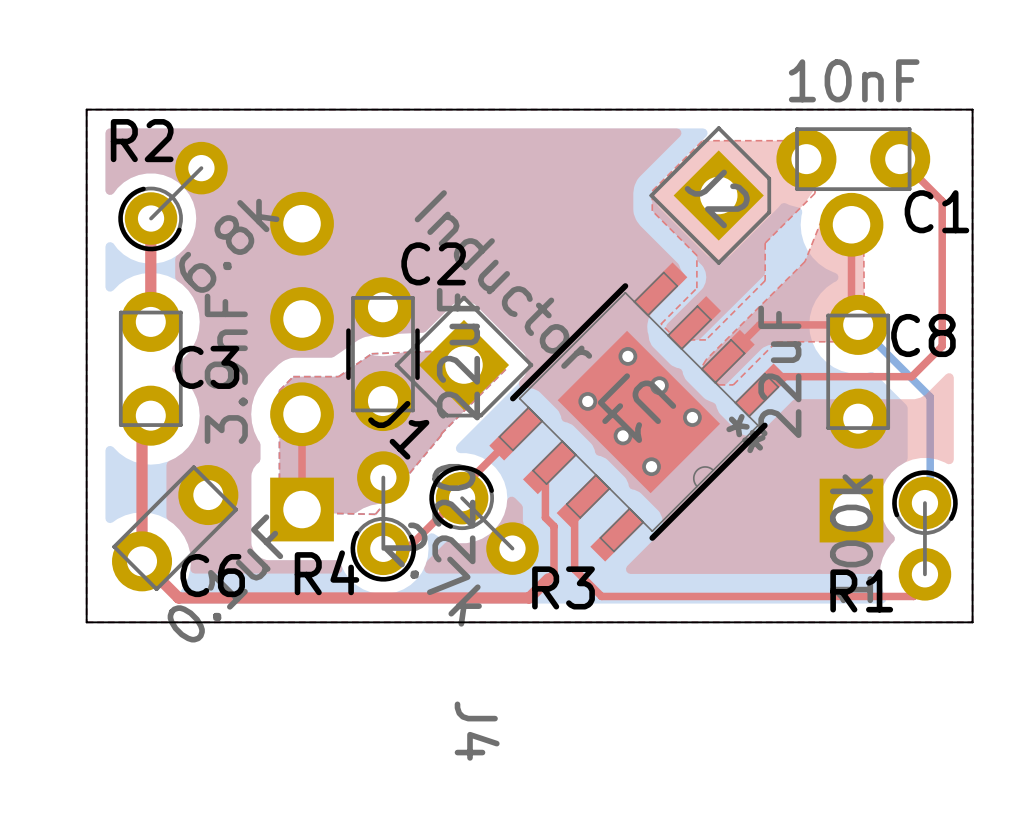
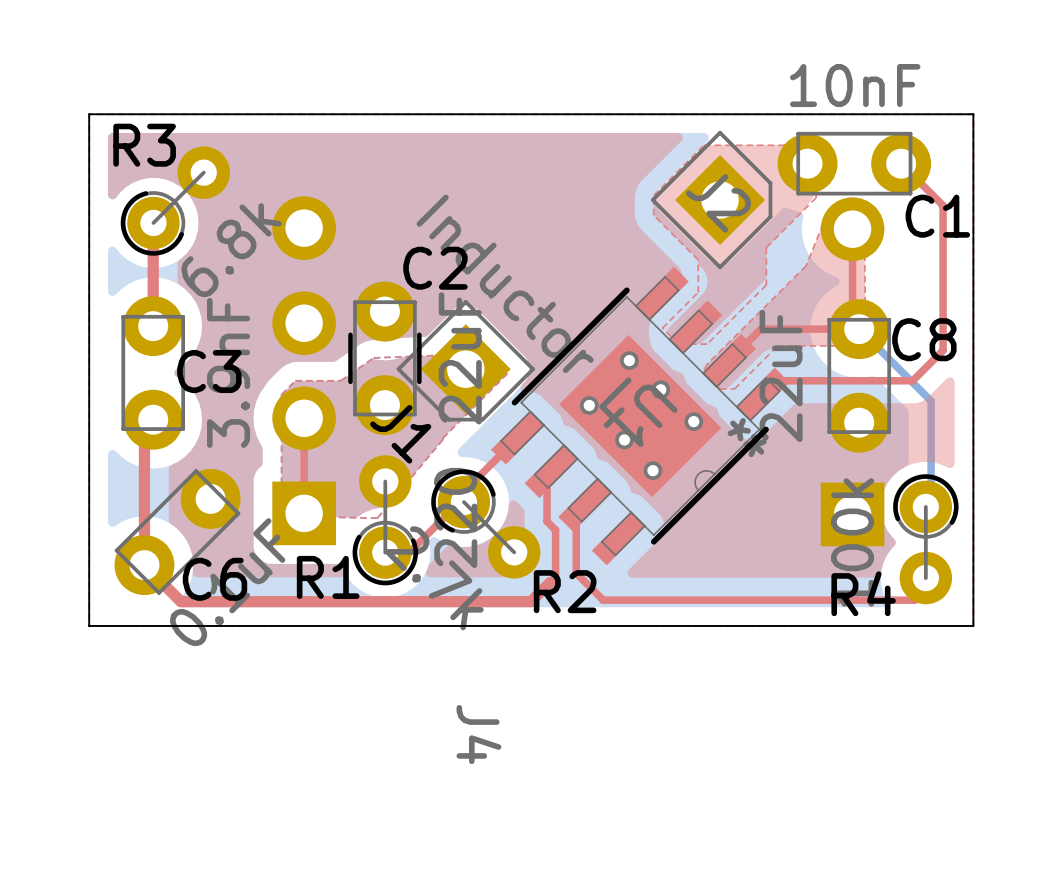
R2 name: R2 (142, 140) -> R3 (144, 145)
R4 name: R4 (326, 572) -> R1 (328, 577)
R3 name: R3 (563, 587) -> R2 (565, 591)
R1 name: R1 (861, 590) -> R4 (863, 593)

